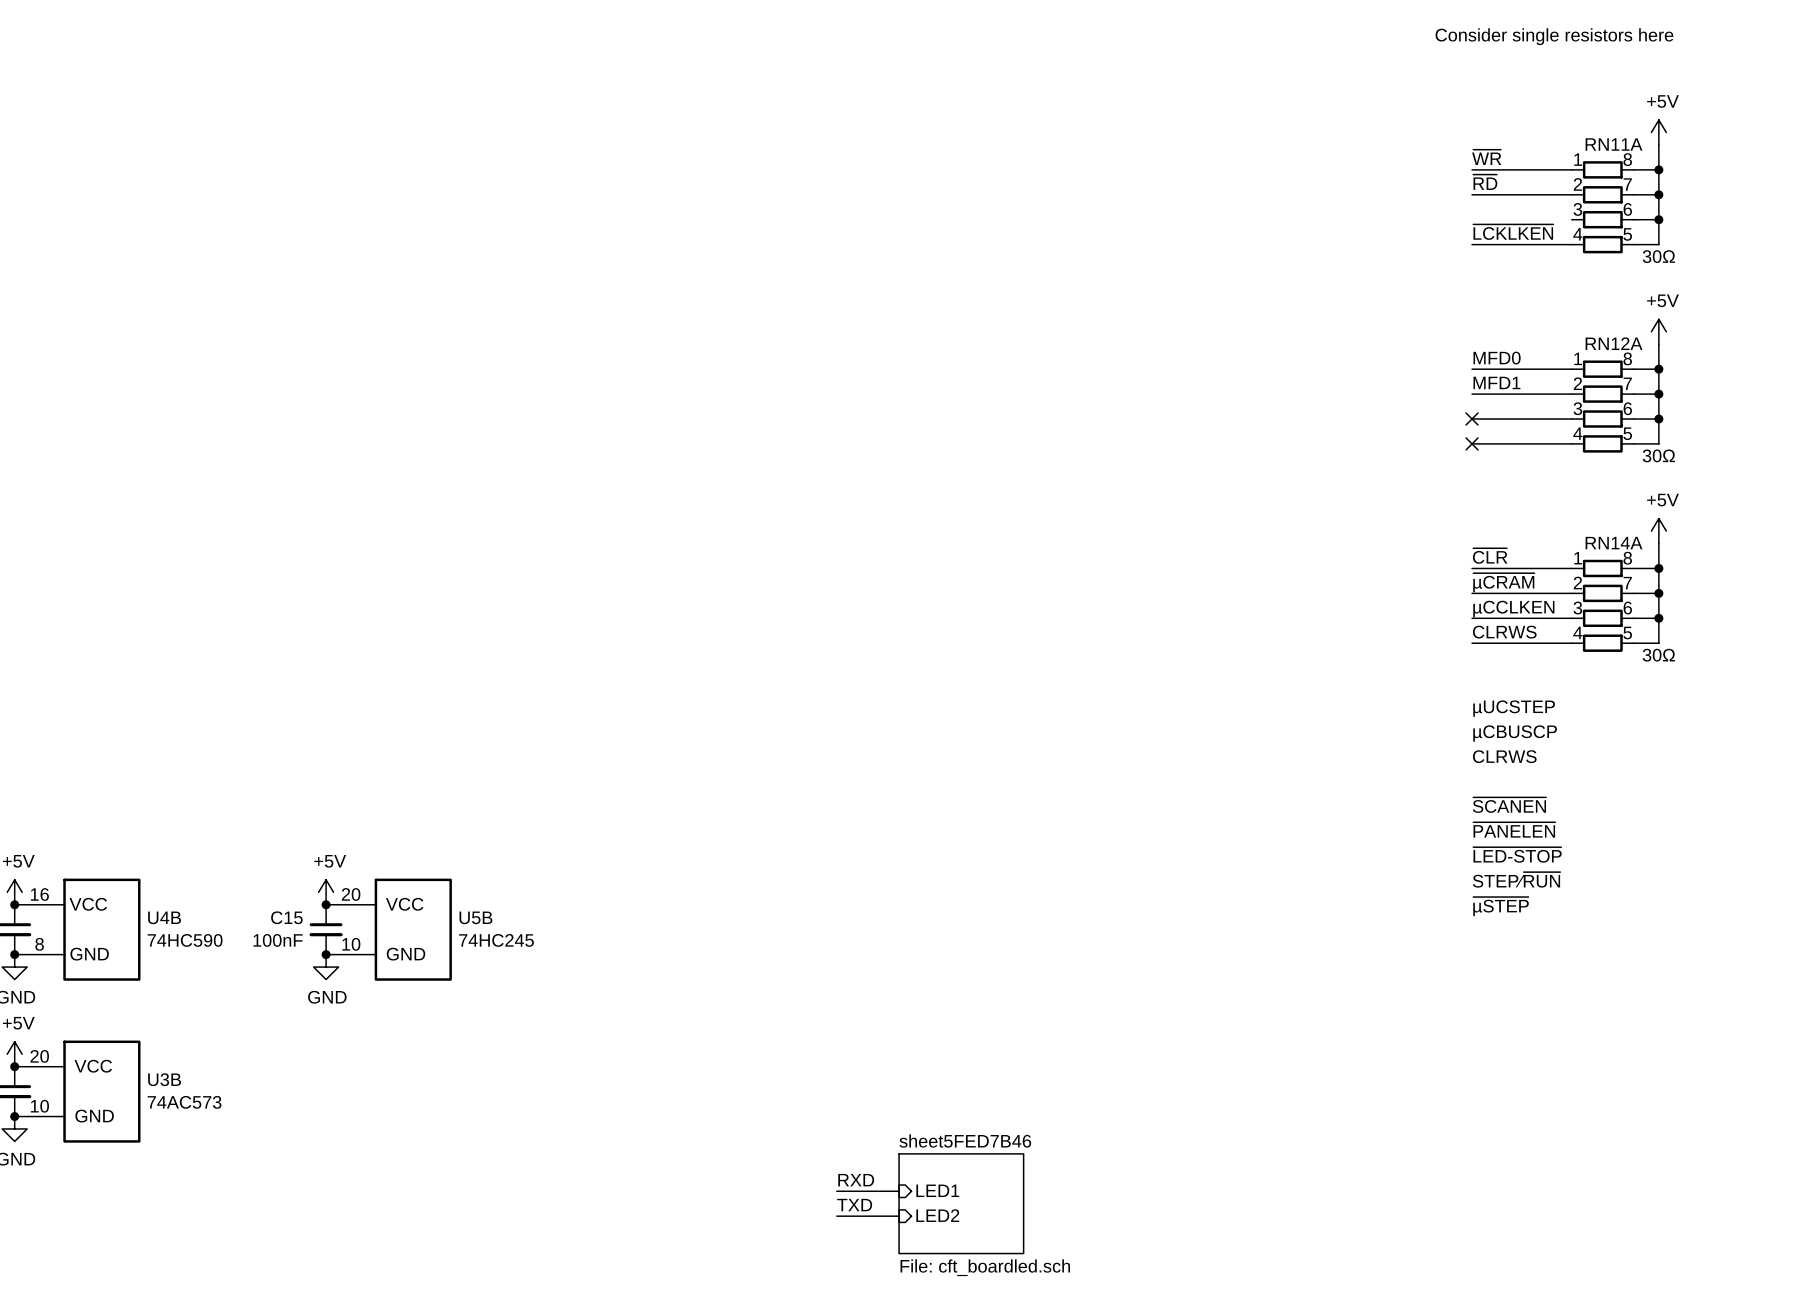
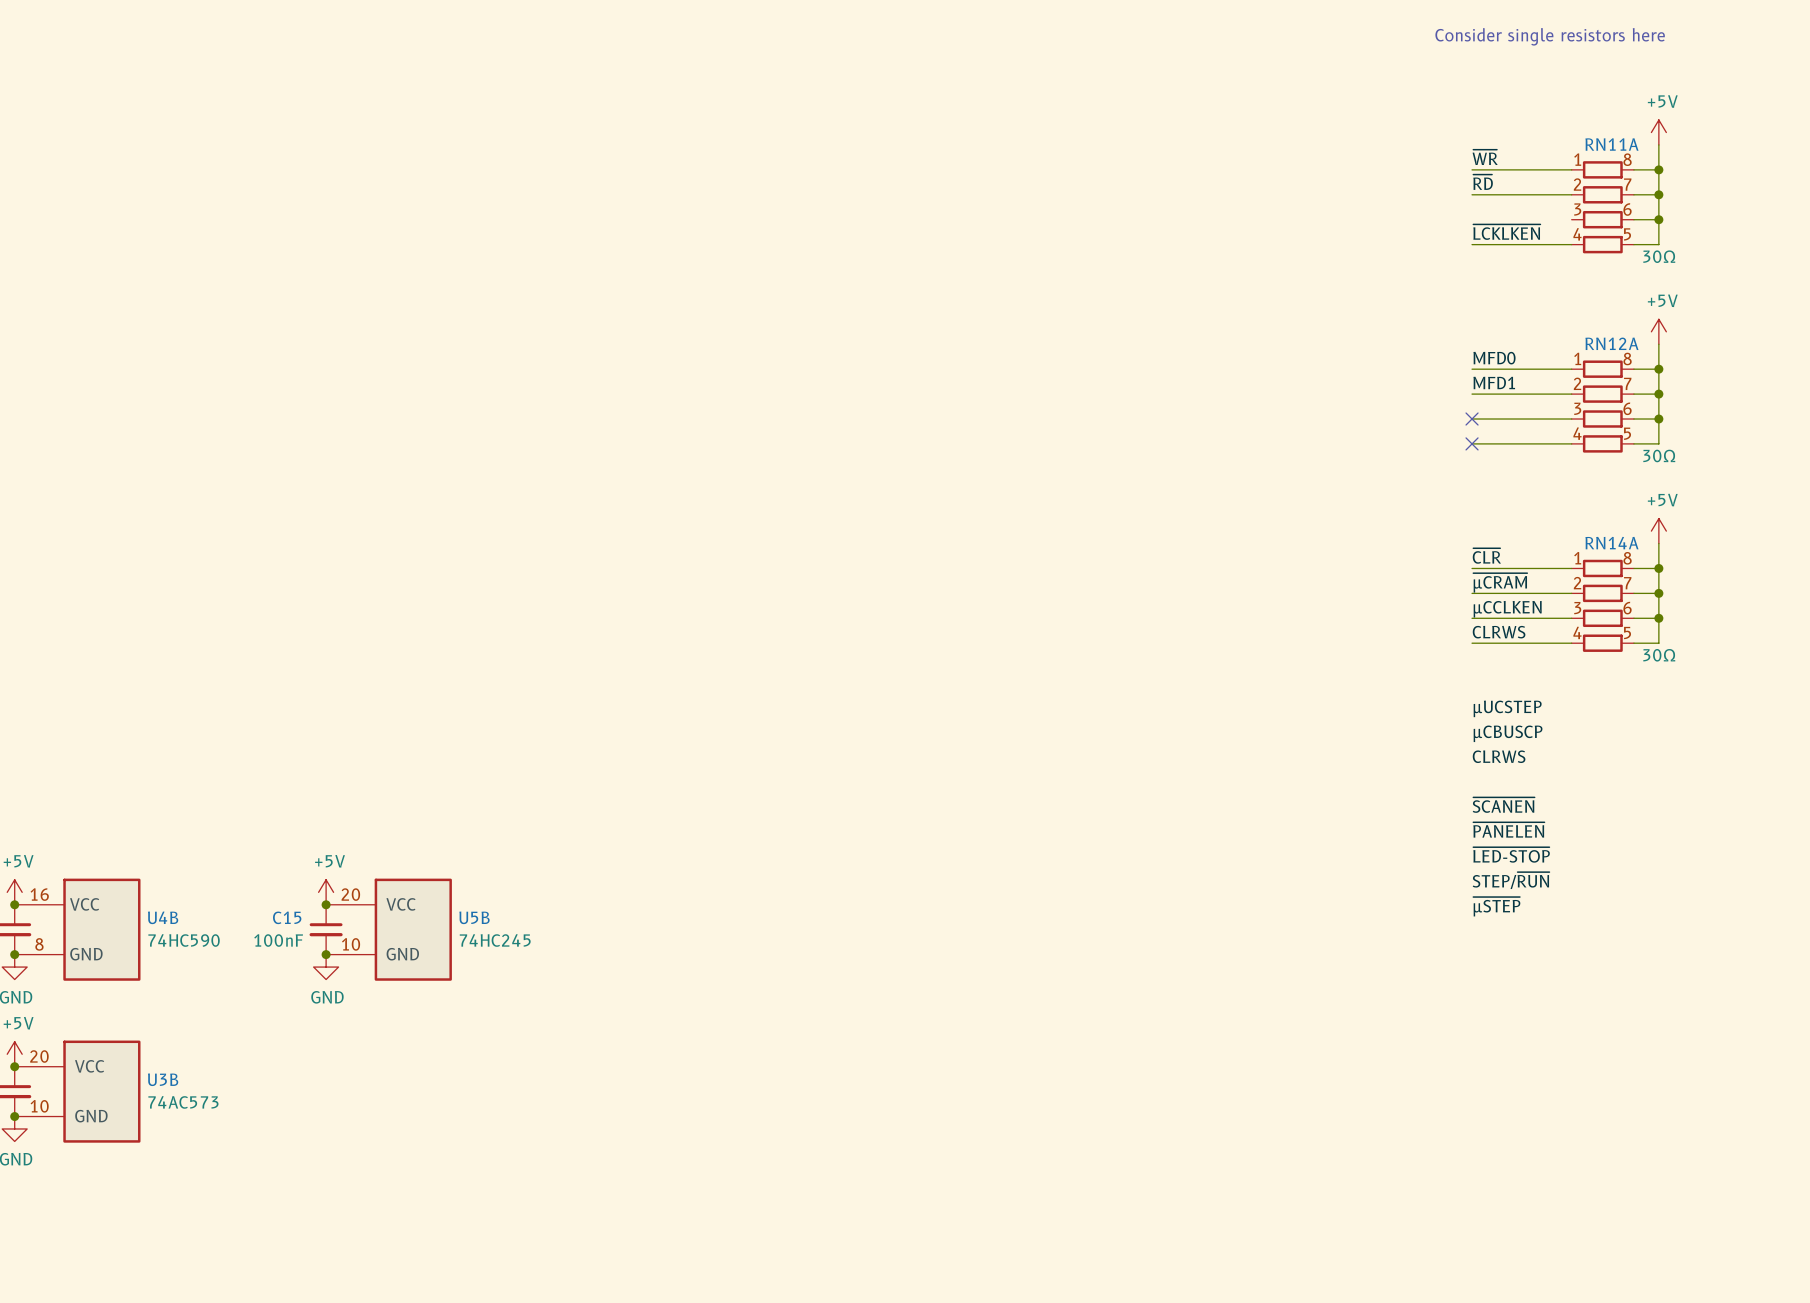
label: RXD (856, 1180) -> none
sheet pin: LED1 (937, 1190) -> none
wire: (836, 1191) (899, 1191) -> none
sheet sheet5FED7B46: File: cft_boardled.sch (961, 1203) -> none
label: TXD (854, 1205) -> none
sheet pin: LED2 (937, 1215) -> none
wire: (836, 1216) (899, 1216) -> none

